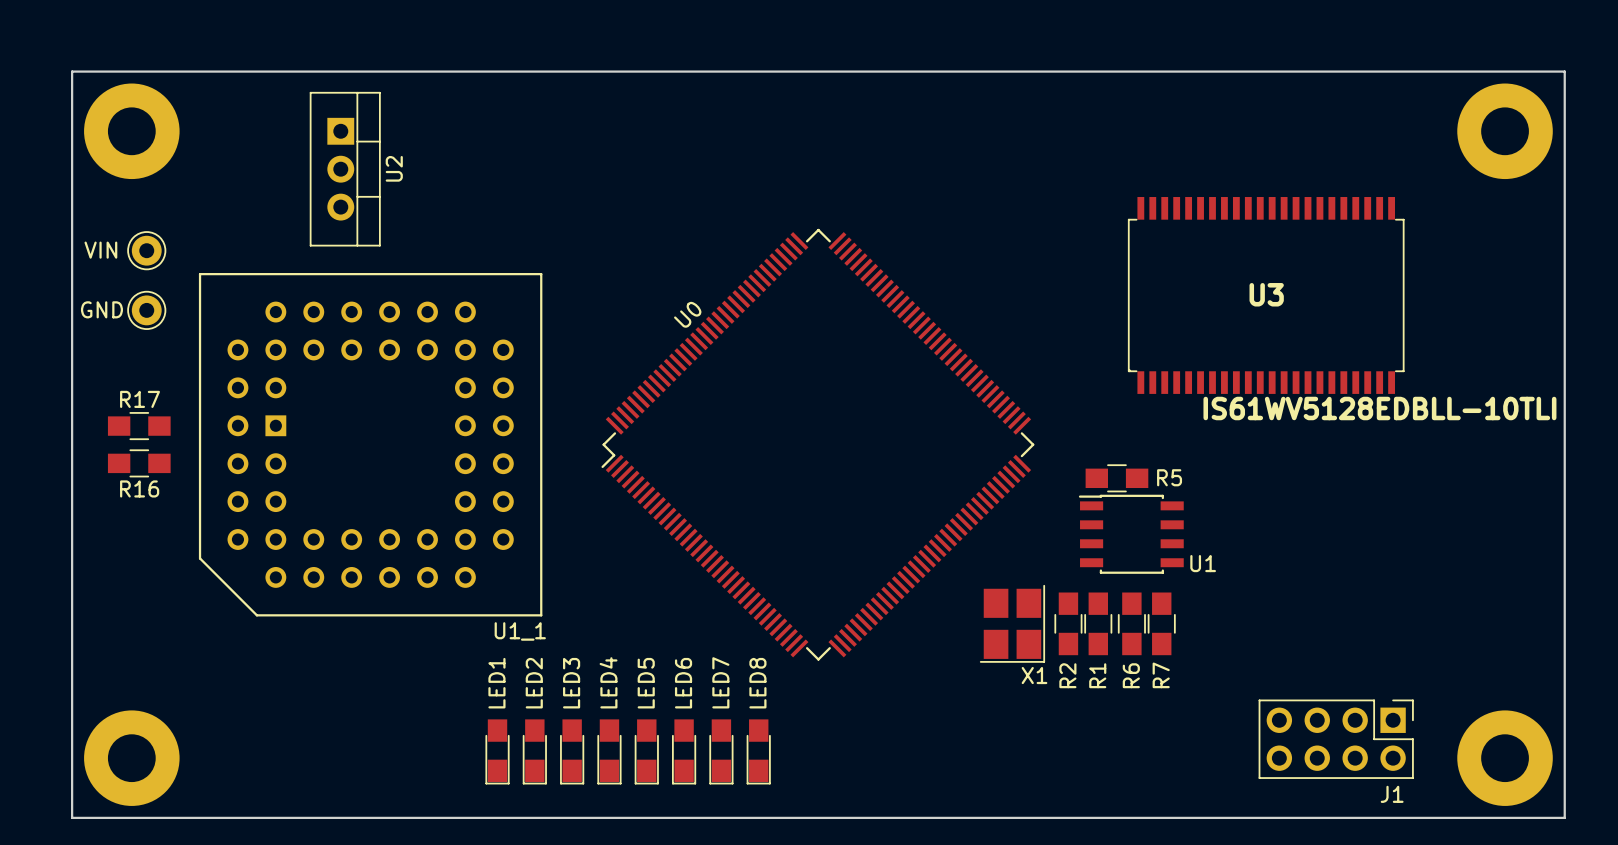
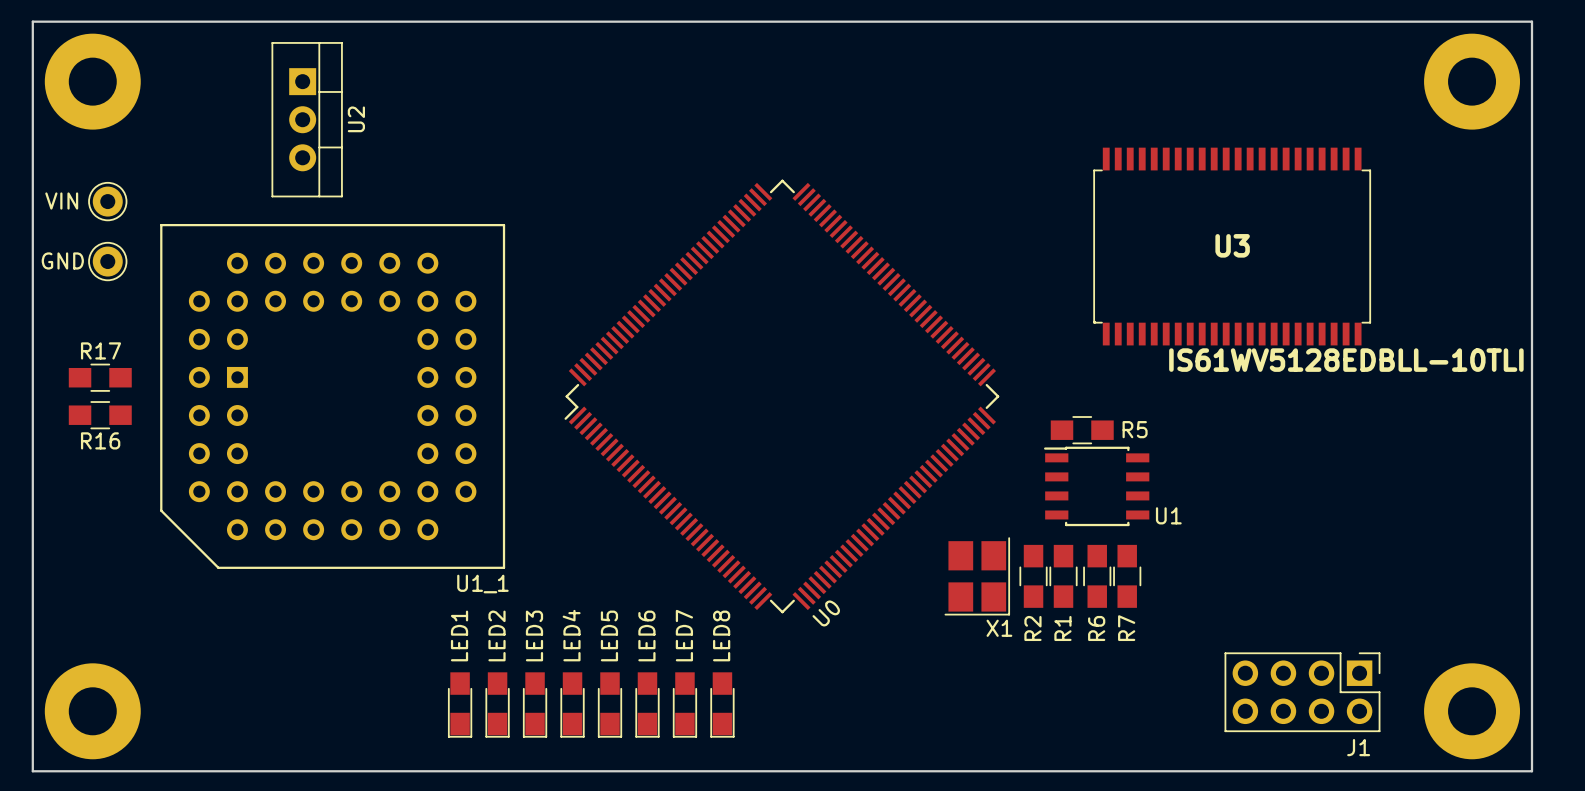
U0 name position: U0 (687, 314) -> U0 (826, 613)

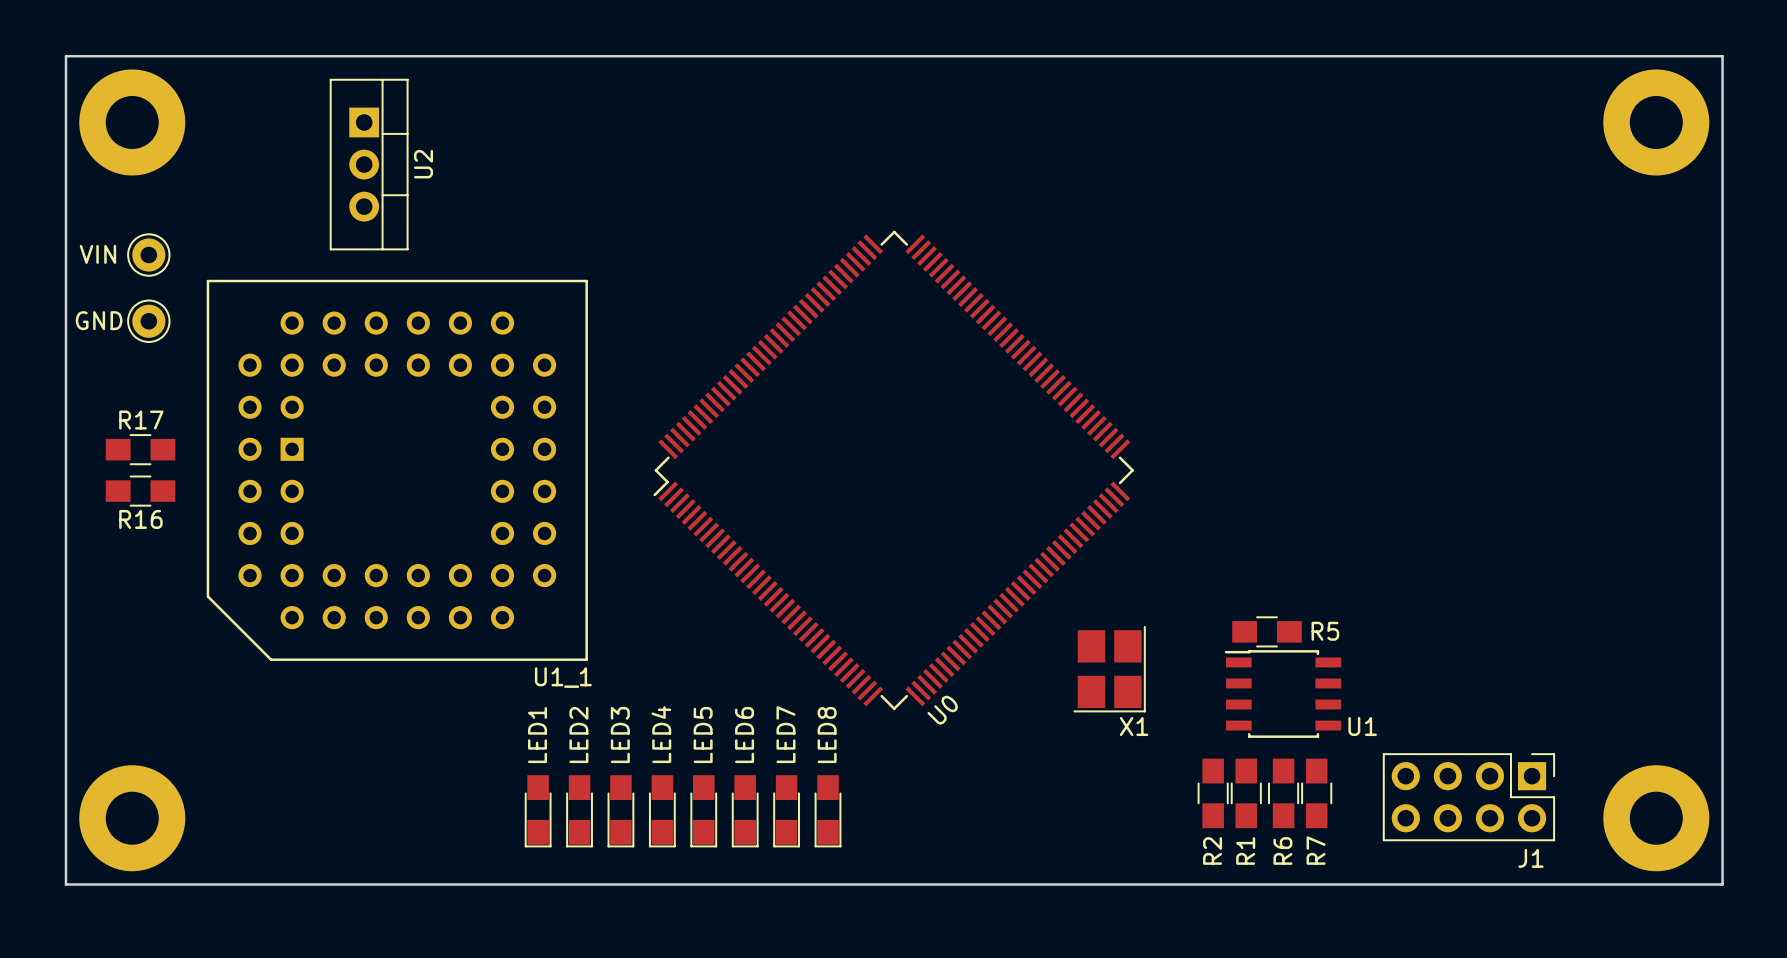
U3: IS61WV5128EDBLL-10TLI (1232, 246) -> none
R5 position: (1082, 430) -> (1267, 631)
U1 position: (1096, 486) -> (1282, 694)
R2 position: (1033, 576) -> (1213, 793)
R1 position: (1063, 576) -> (1246, 793)
R6 position: (1097, 576) -> (1283, 793)
R7 position: (1127, 576) -> (1316, 793)

